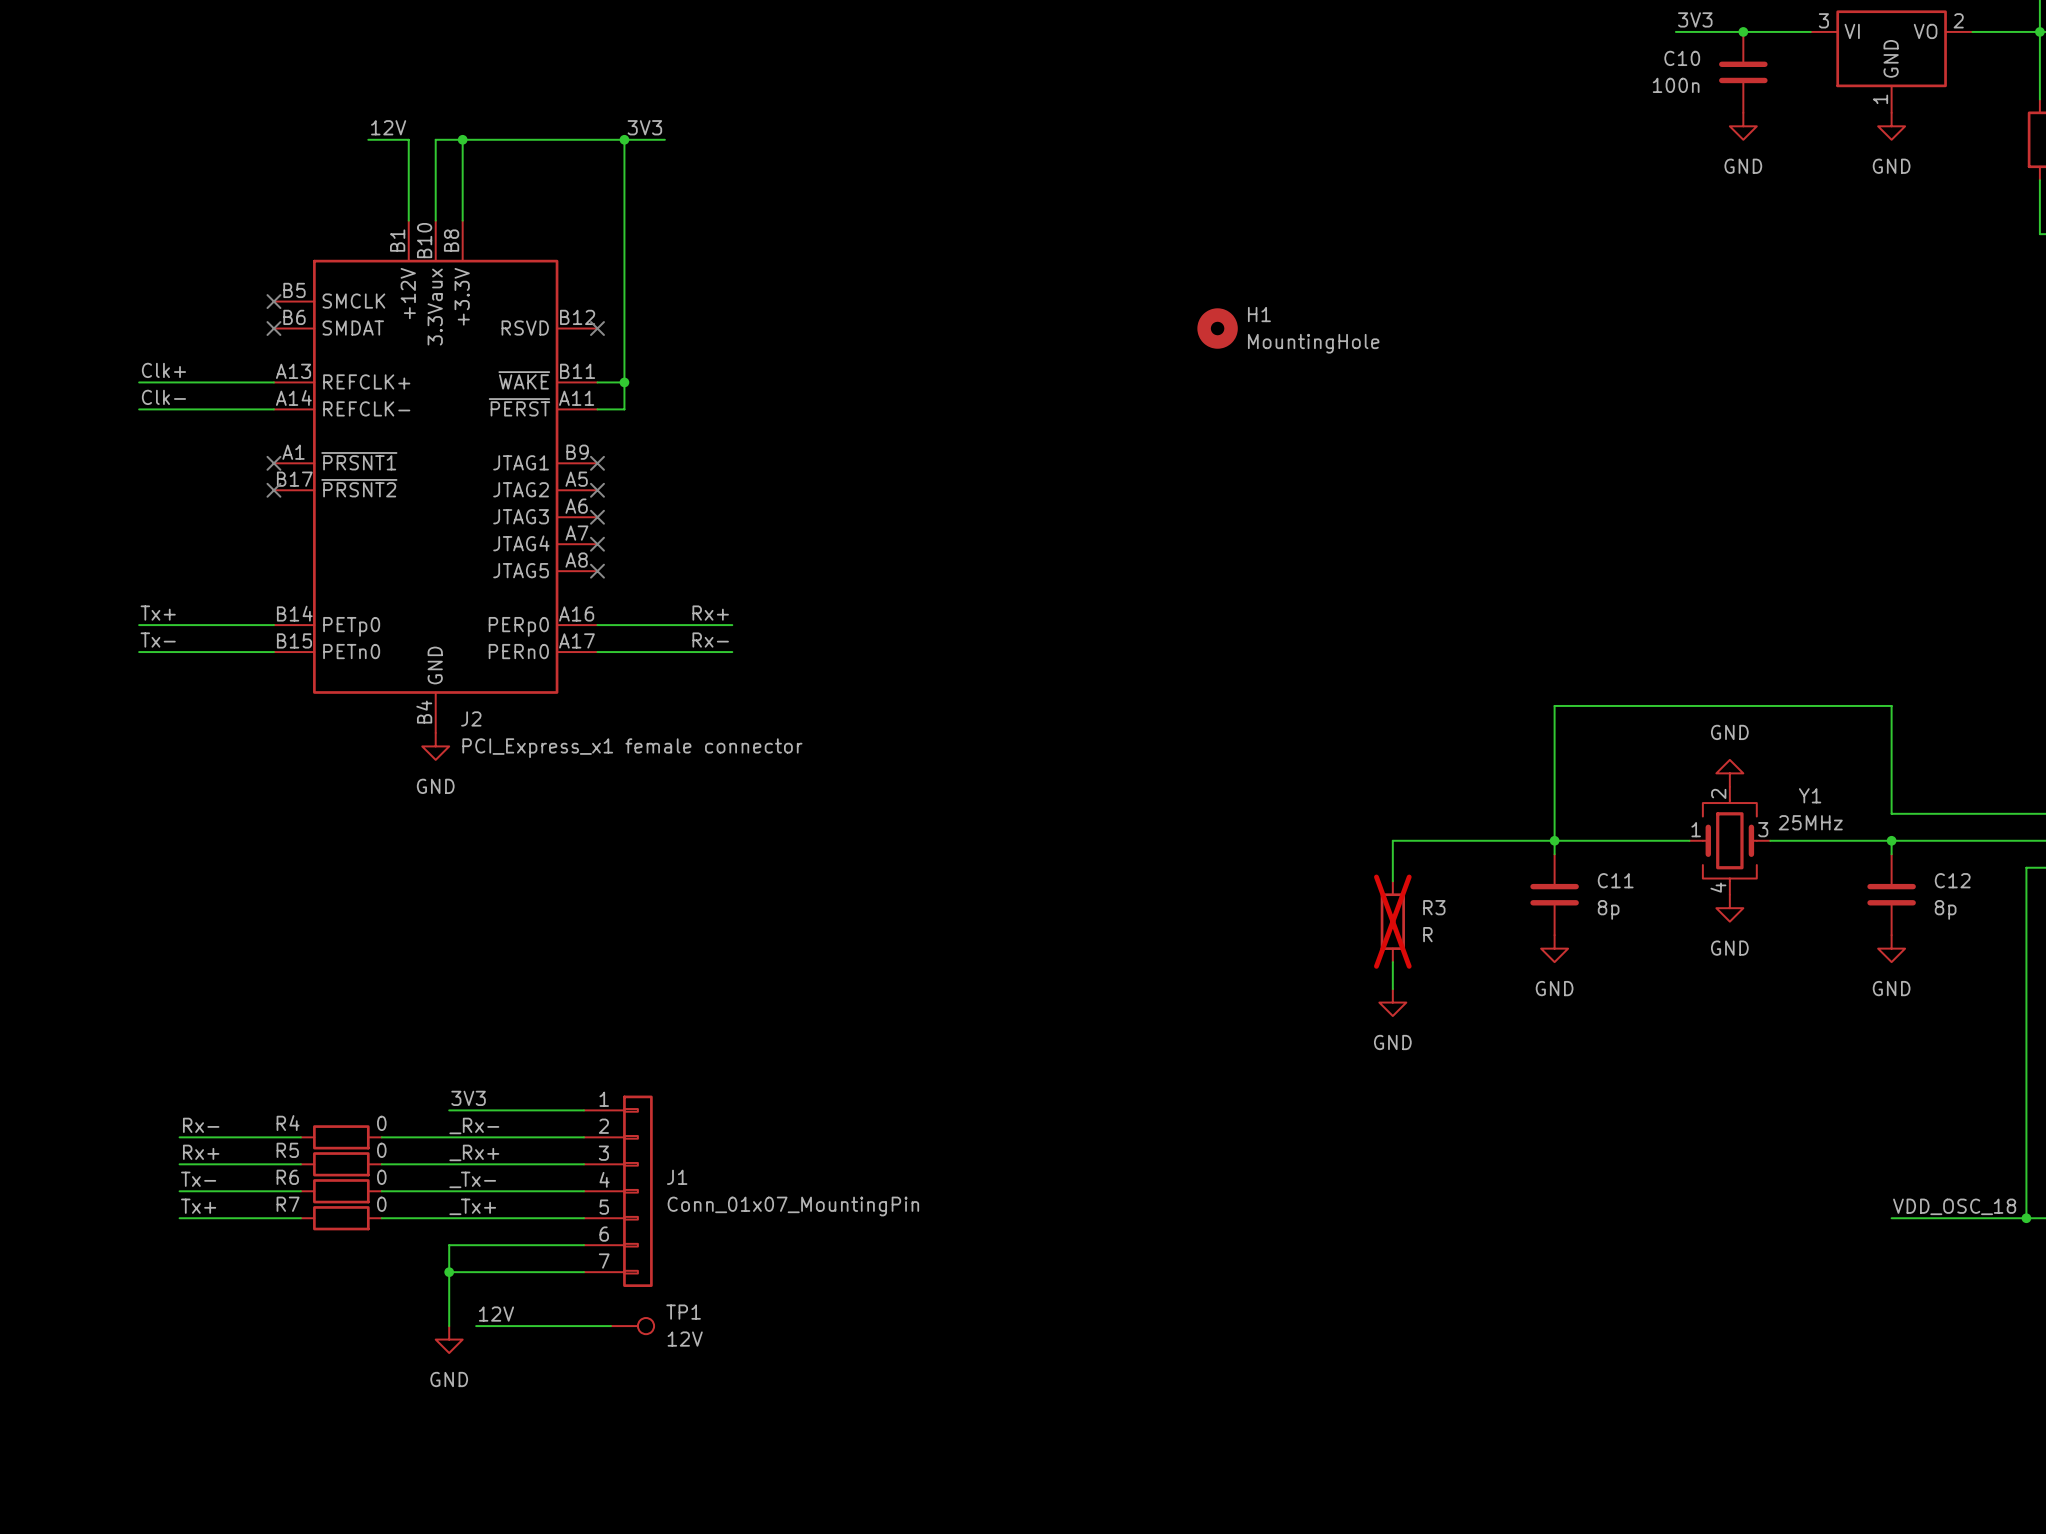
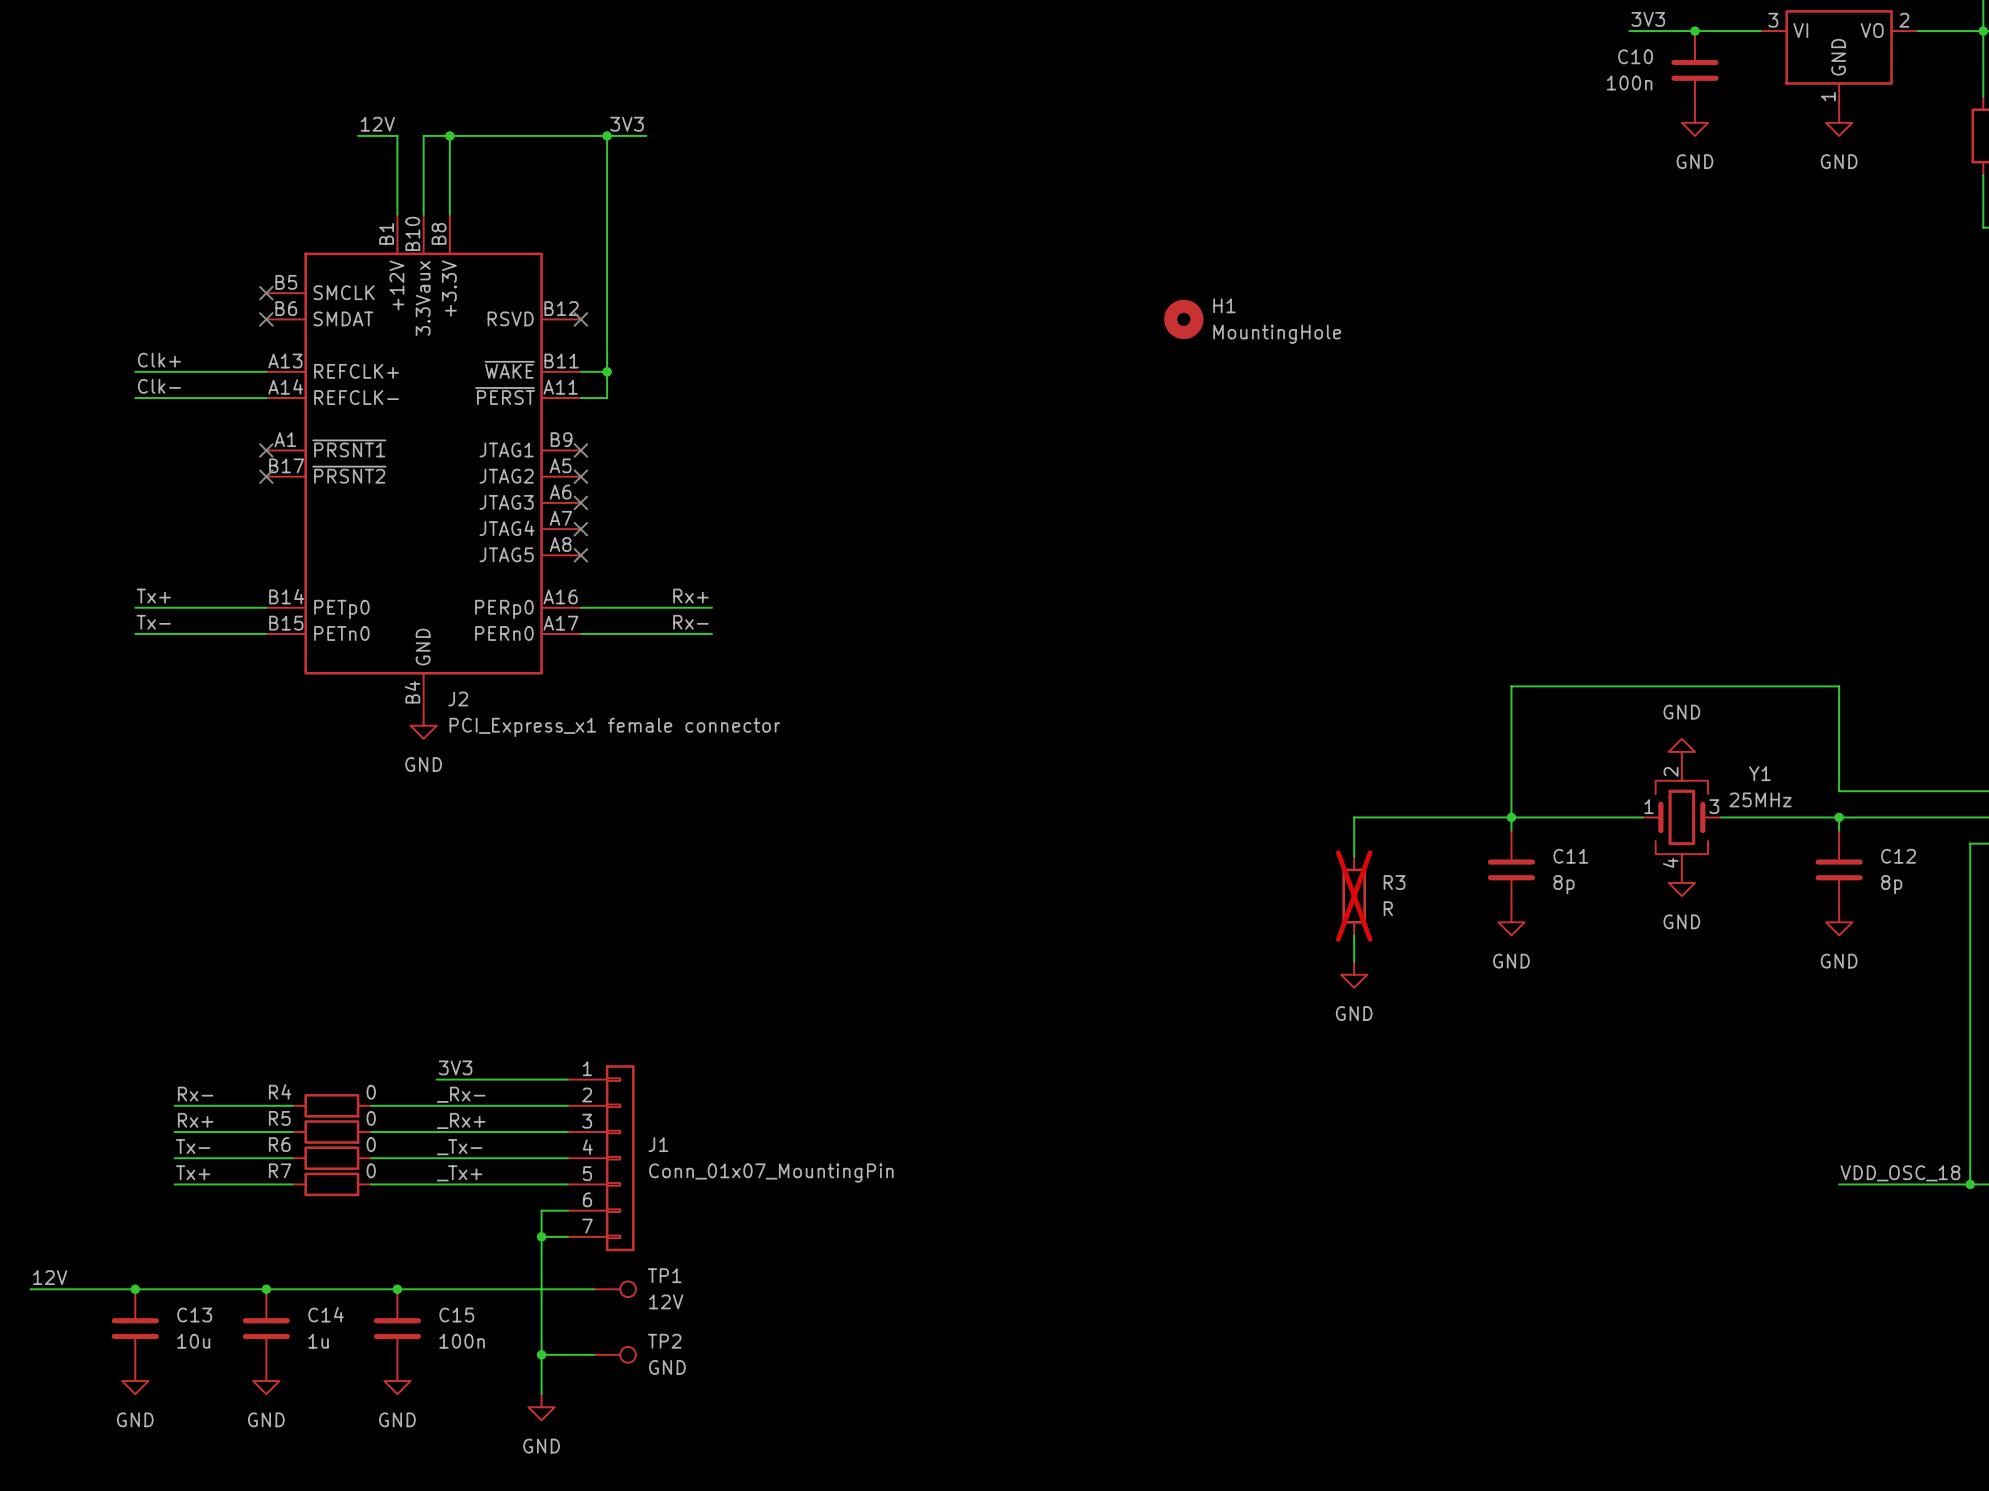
wire: (557, 1245) (449, 1245) (449, 1326) -> (541, 1210) (541, 1394)
wire: (449, 1272) (557, 1272) -> none
junction: (449, 1272) -> none
junction: none -> (541, 1236)
label: none -> 12V (50, 1277)
label: 12V (496, 1314) -> none
wire: none -> (30, 1289) (462, 1289)
junction: none -> (135, 1289)
junction: none -> (266, 1289)
junction: none -> (397, 1289)
power symbol: GND (449, 1339) -> none
C13: none -> 10u (135, 1328)
C14: none -> 1u (266, 1328)
C15: none -> 100n (397, 1328)
wire: none -> (541, 1354) (594, 1354)
junction: none -> (541, 1354)
TP2: none -> GND (614, 1354)
power symbol: none -> GND (135, 1381)
power symbol: none -> GND (266, 1381)
power symbol: none -> GND (397, 1381)
power symbol: none -> GND (541, 1407)

